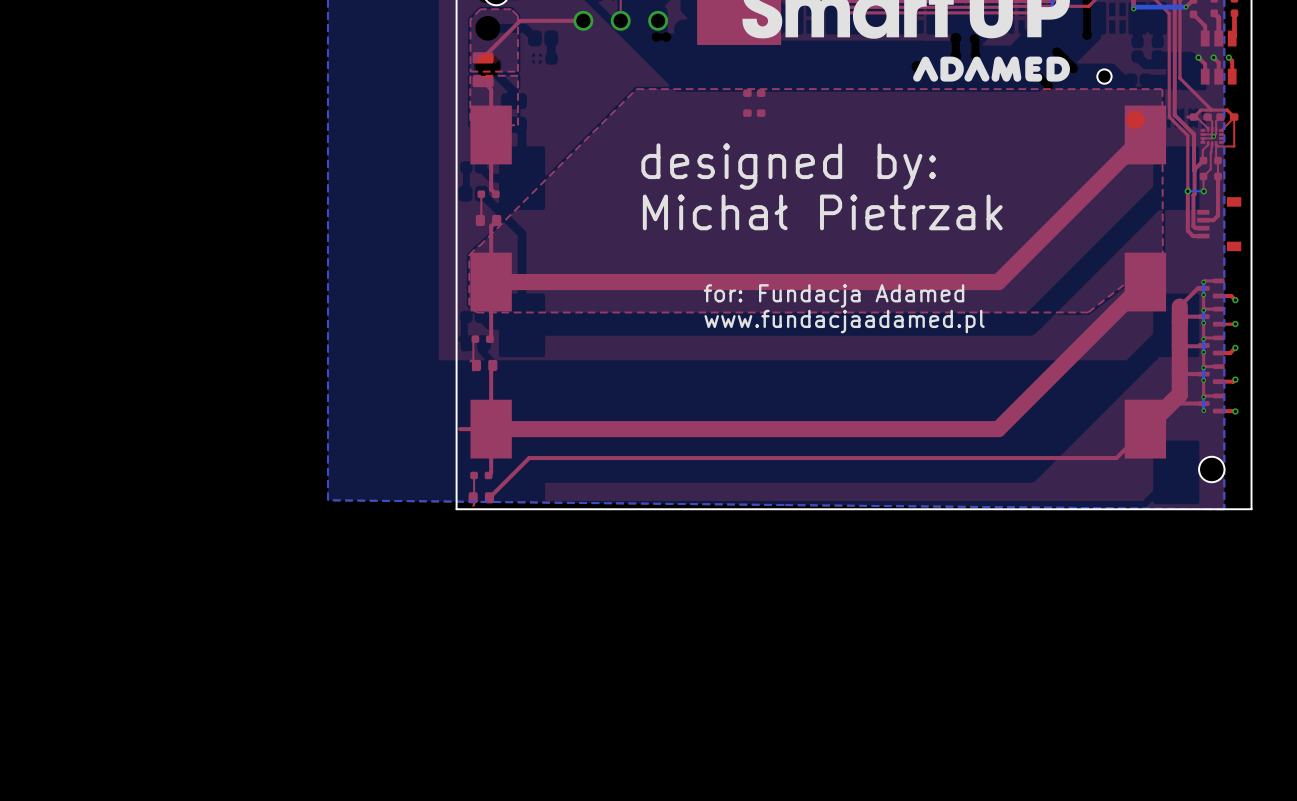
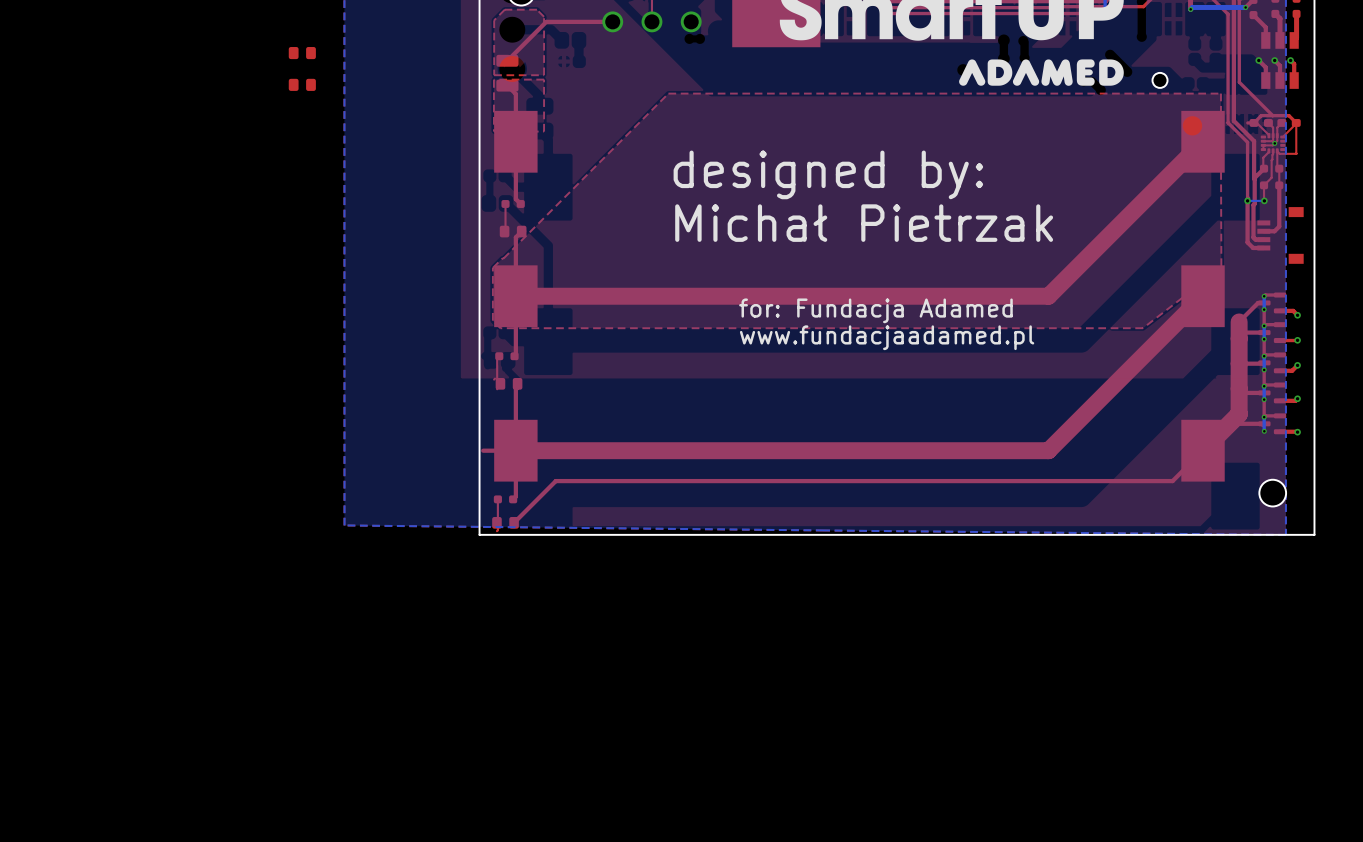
part: none -> (302, 53)
part: none -> (302, 84)
part: (754, 93) -> none
part: (754, 113) -> none

